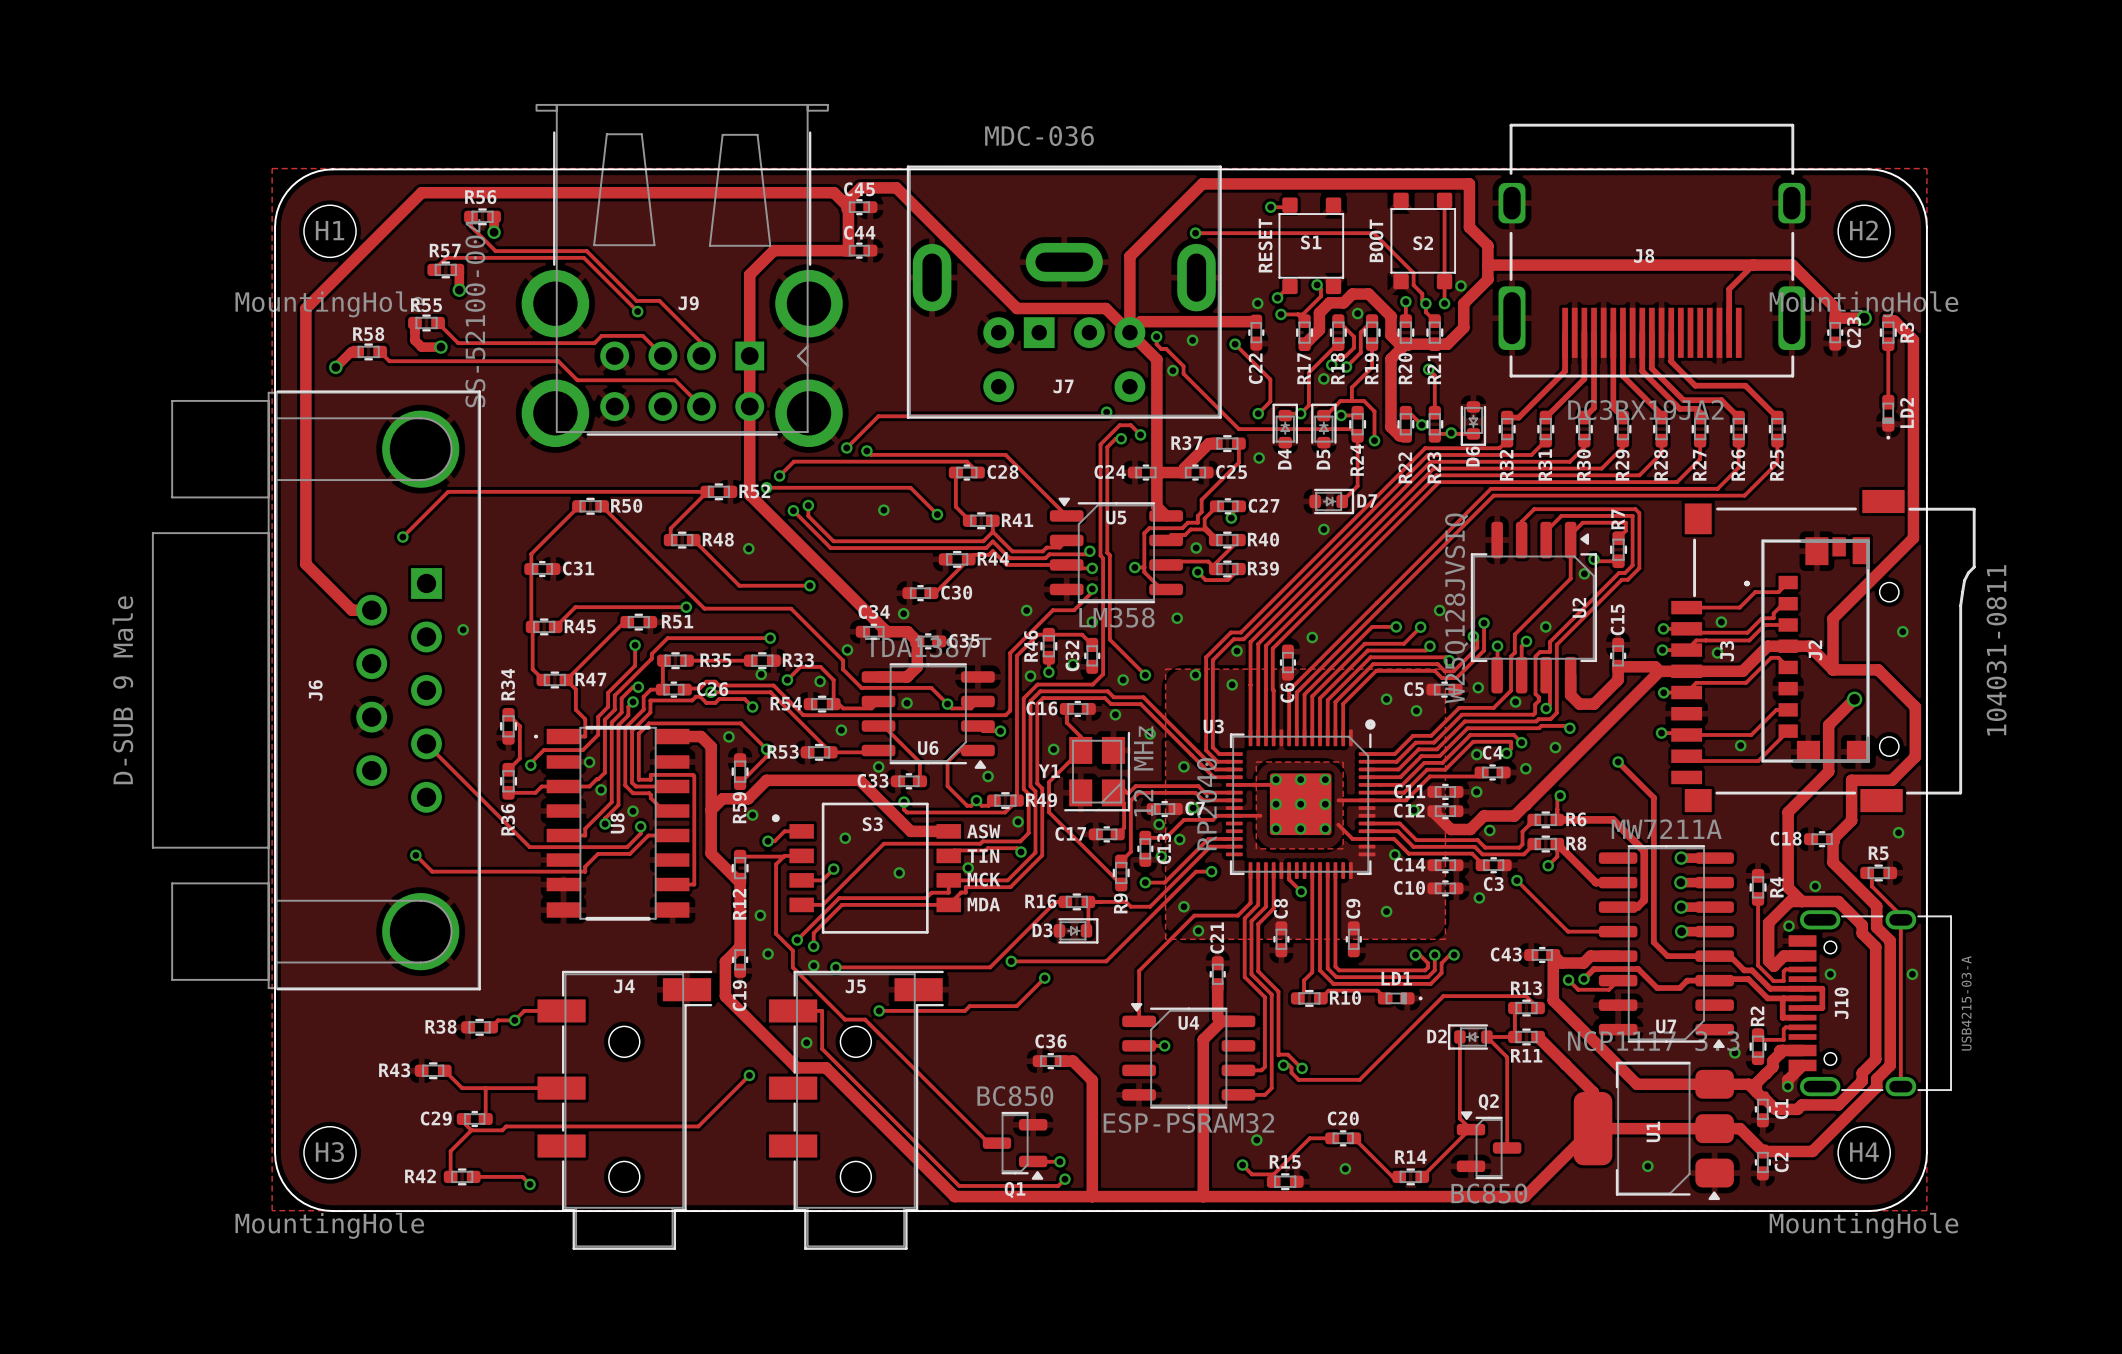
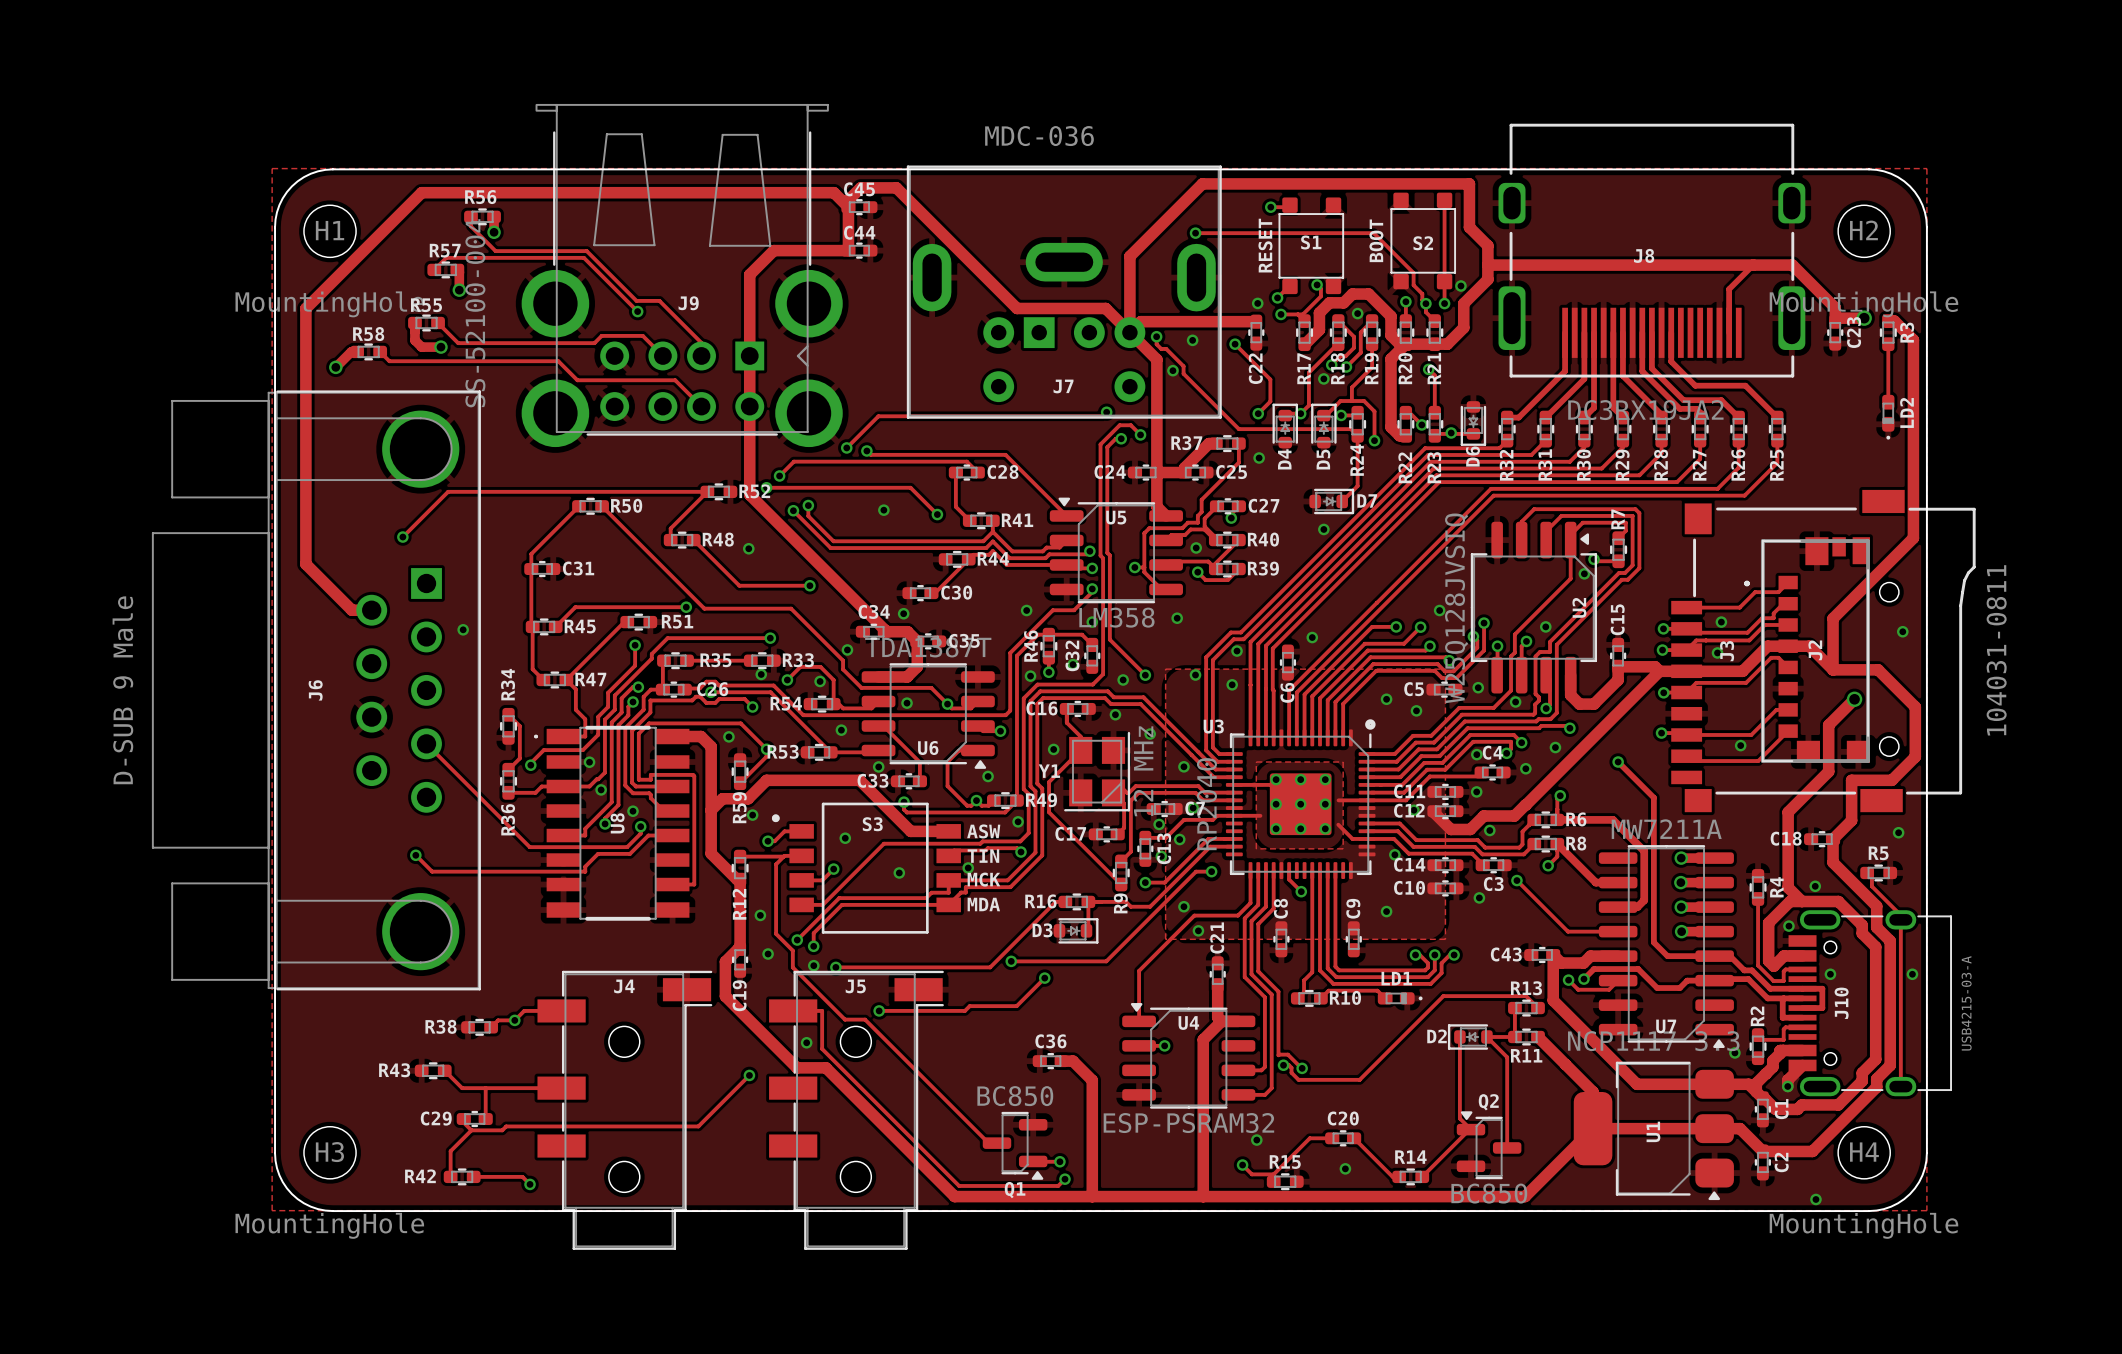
via: (1647, 1166) -> none
via: none -> (1815, 1199)

